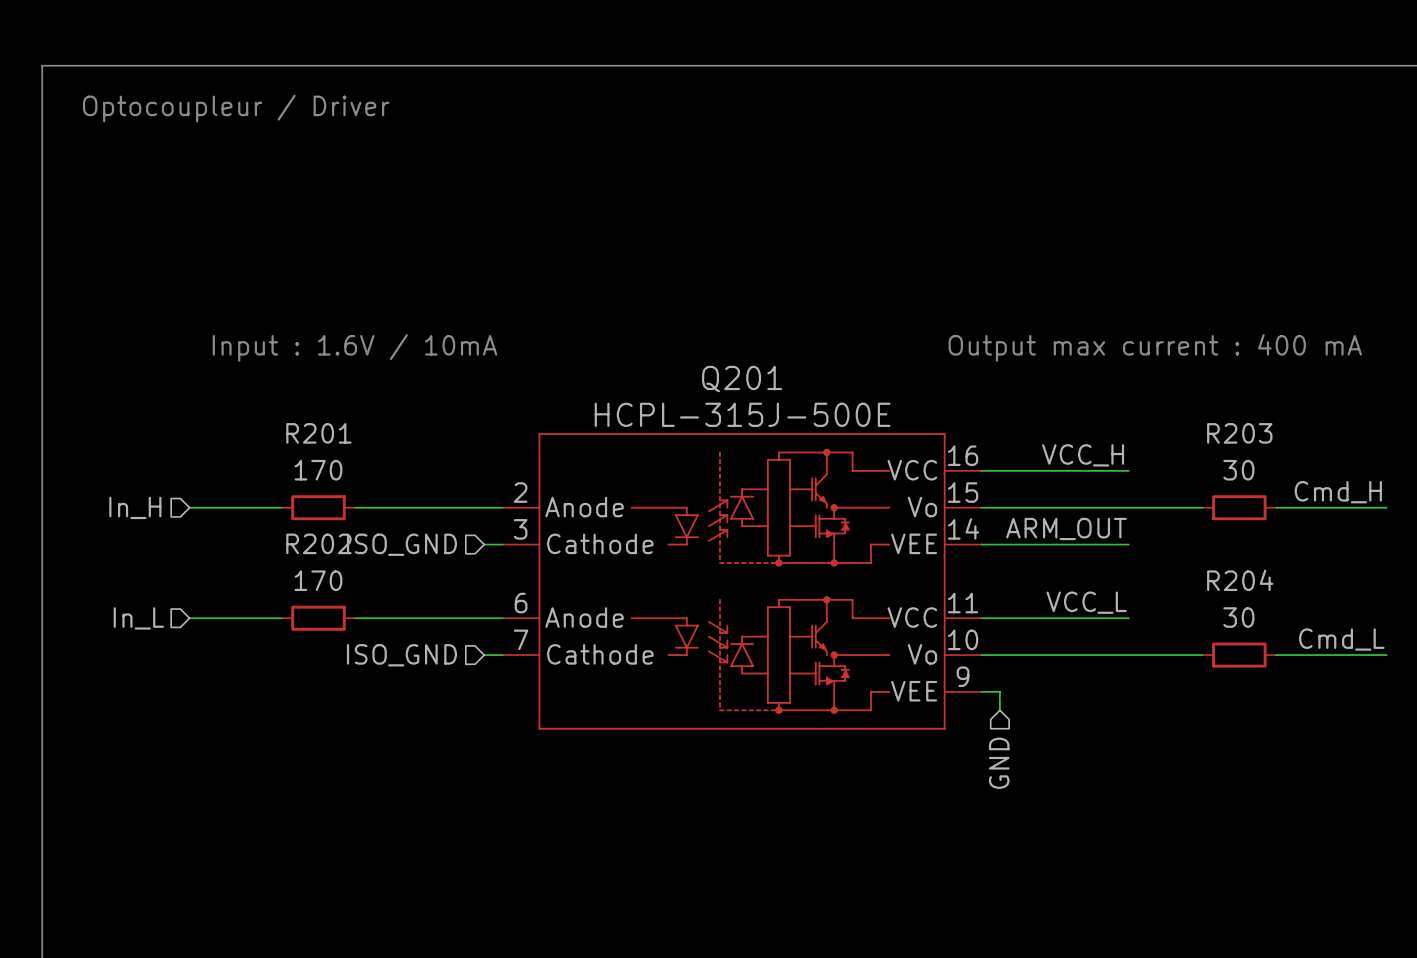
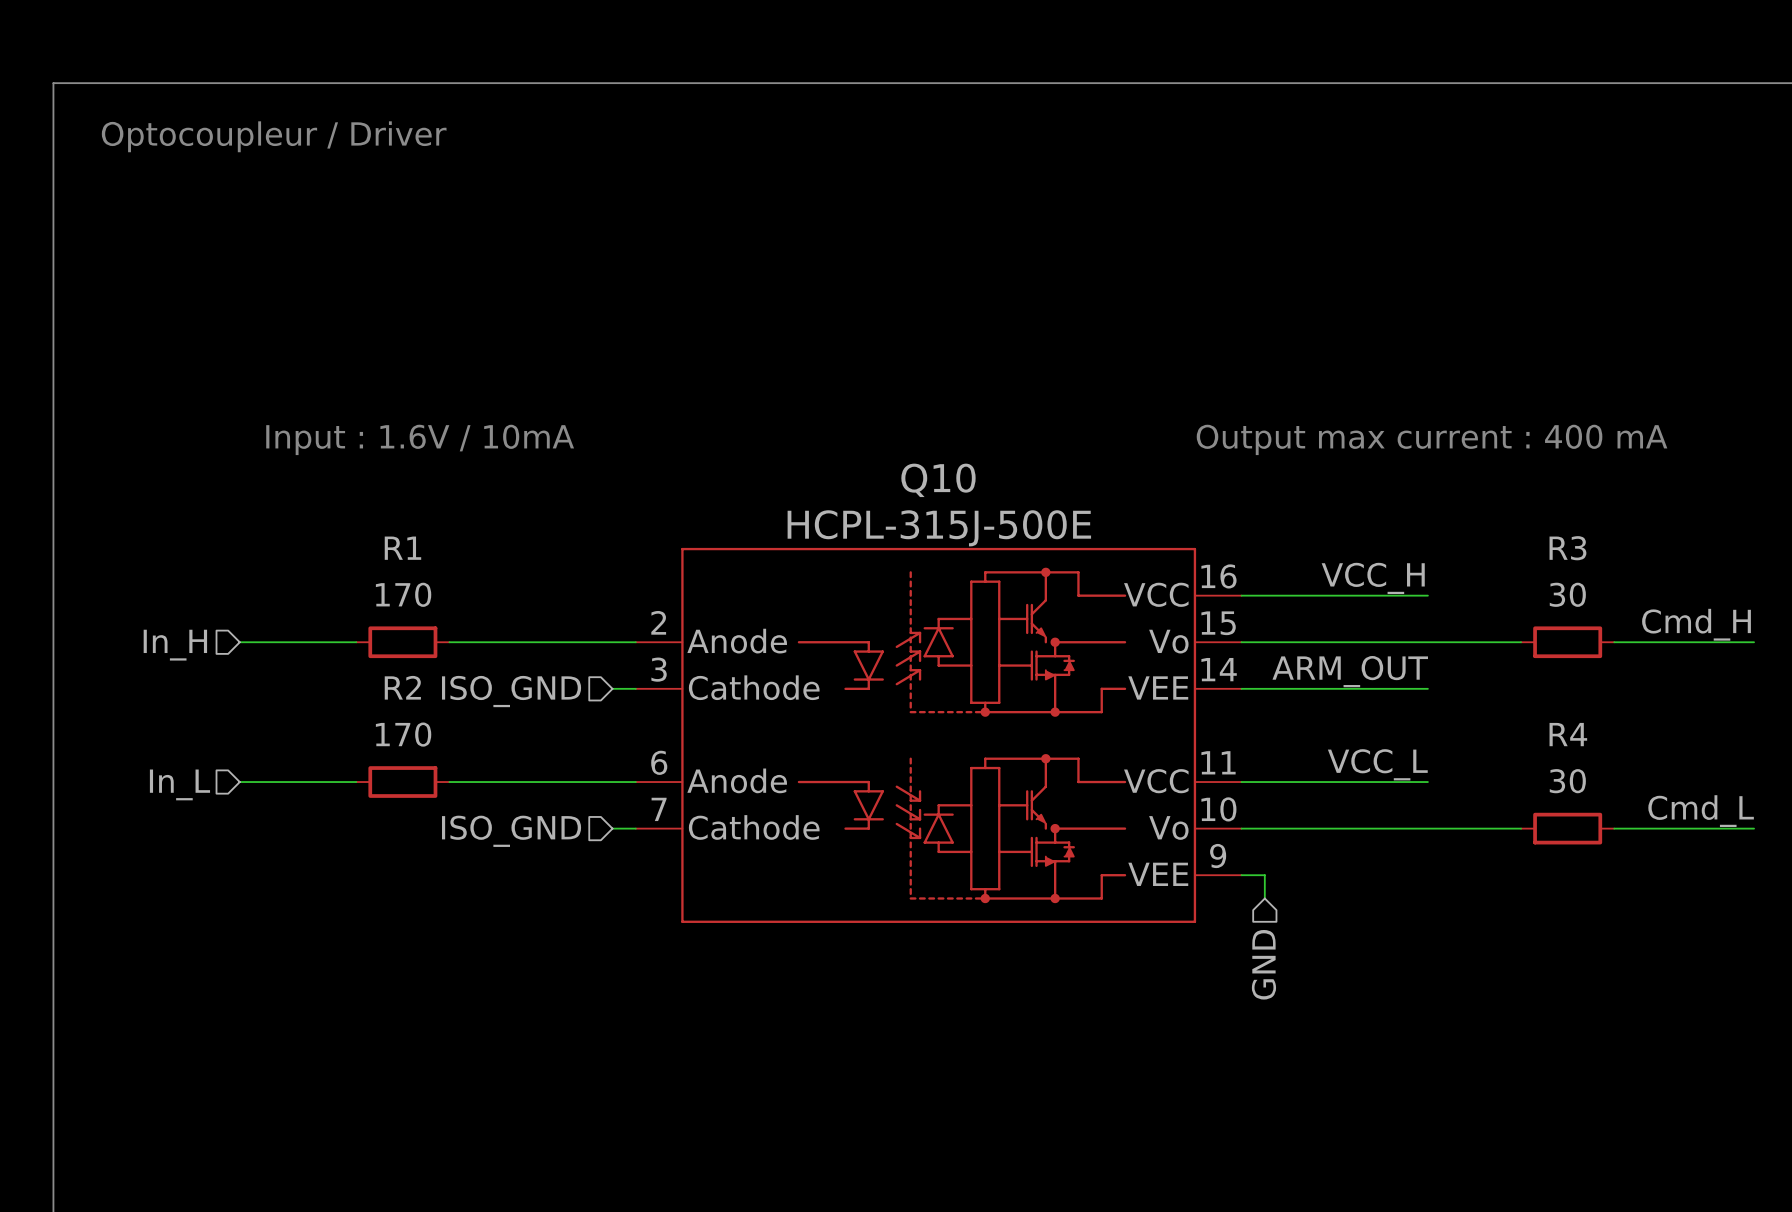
Q201 name: Q201 (742, 379) -> Q10 (938, 480)
R201 name: R201 (318, 433) -> R1 (402, 548)
R203 name: R203 (1239, 433) -> R3 (1567, 548)
R202 name: R202 (318, 543) -> R2 (402, 687)
R204 name: R204 (1240, 580) -> R4 (1568, 734)

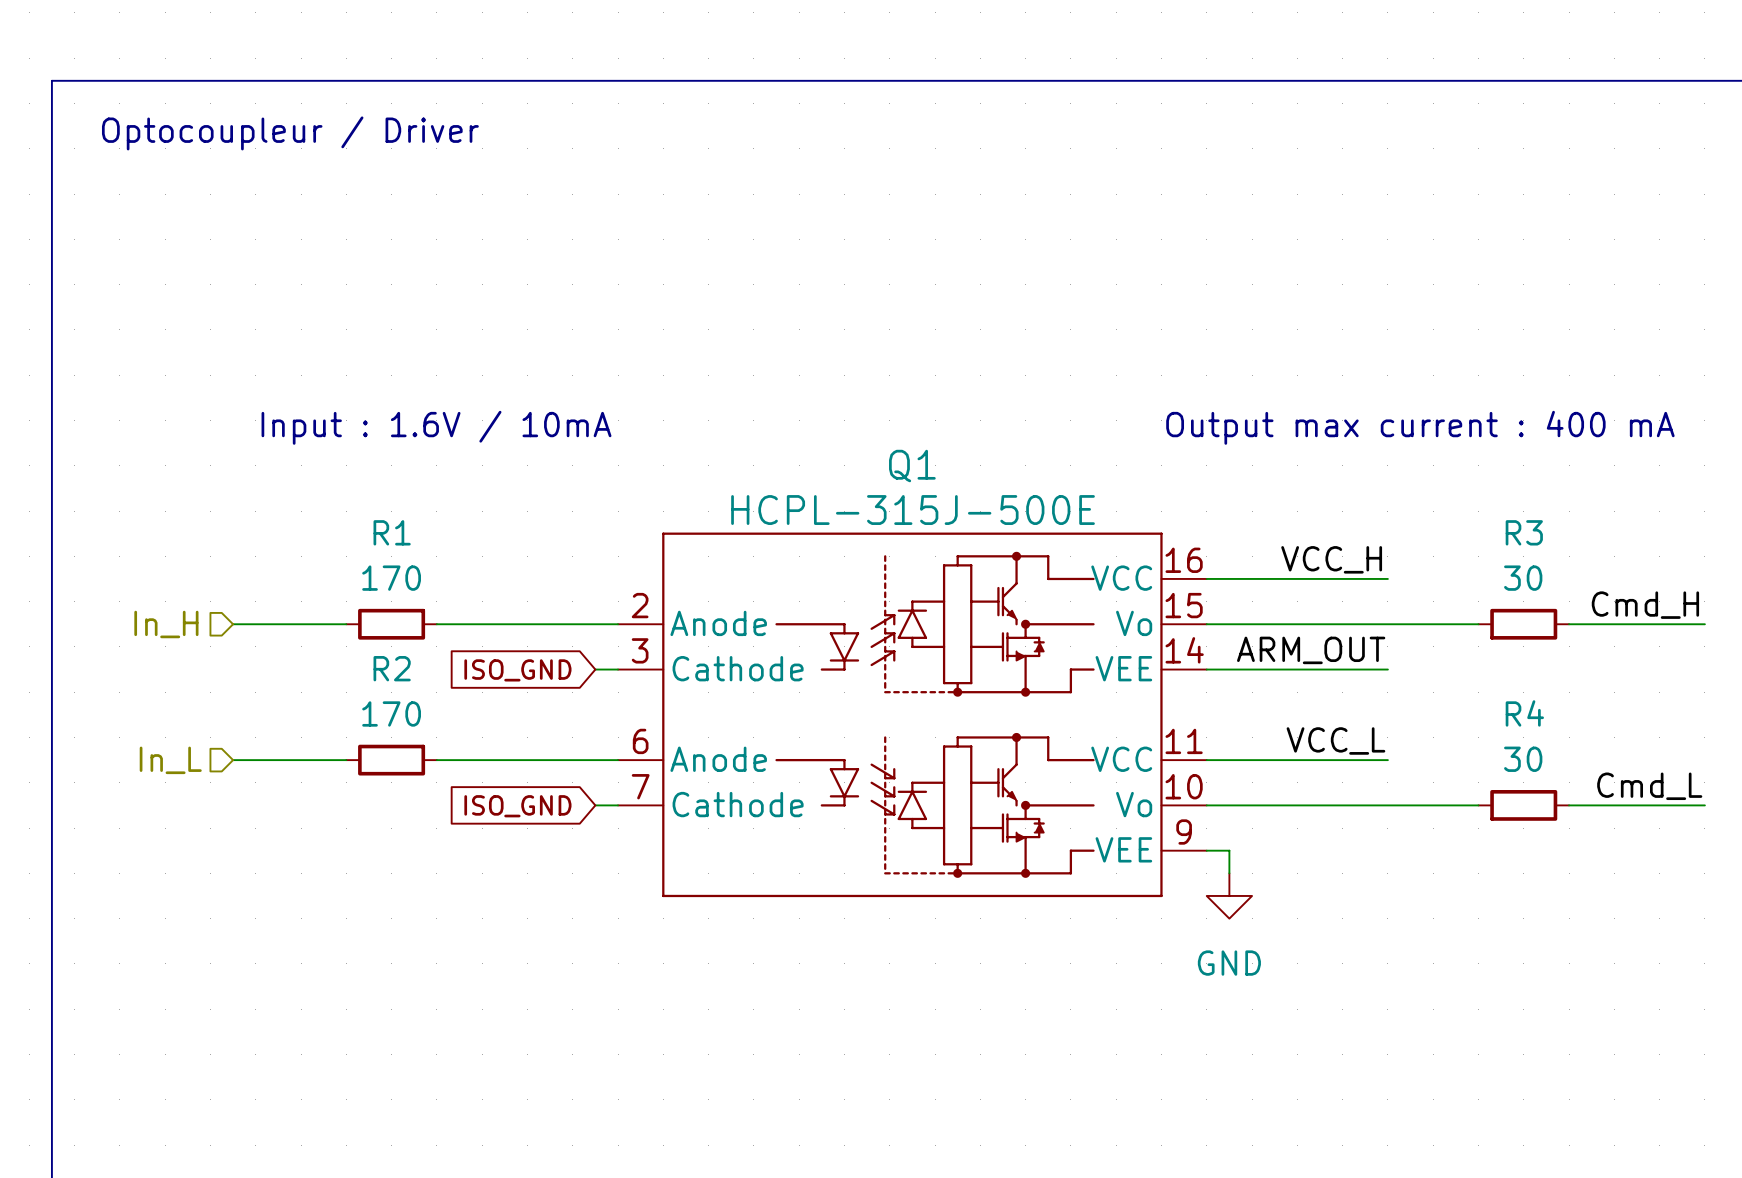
Q10 name: Q10 (938, 480) -> Q1 (912, 466)
hierarchical label: ISO_GND (511, 691) -> none
global label: none -> ISO_GND (517, 670)
hierarchical label: ISO_GND (511, 831) -> none
global label: none -> ISO_GND (517, 806)
power symbol: none -> GND (1229, 895)
hierarchical label: GND (1263, 964) -> none

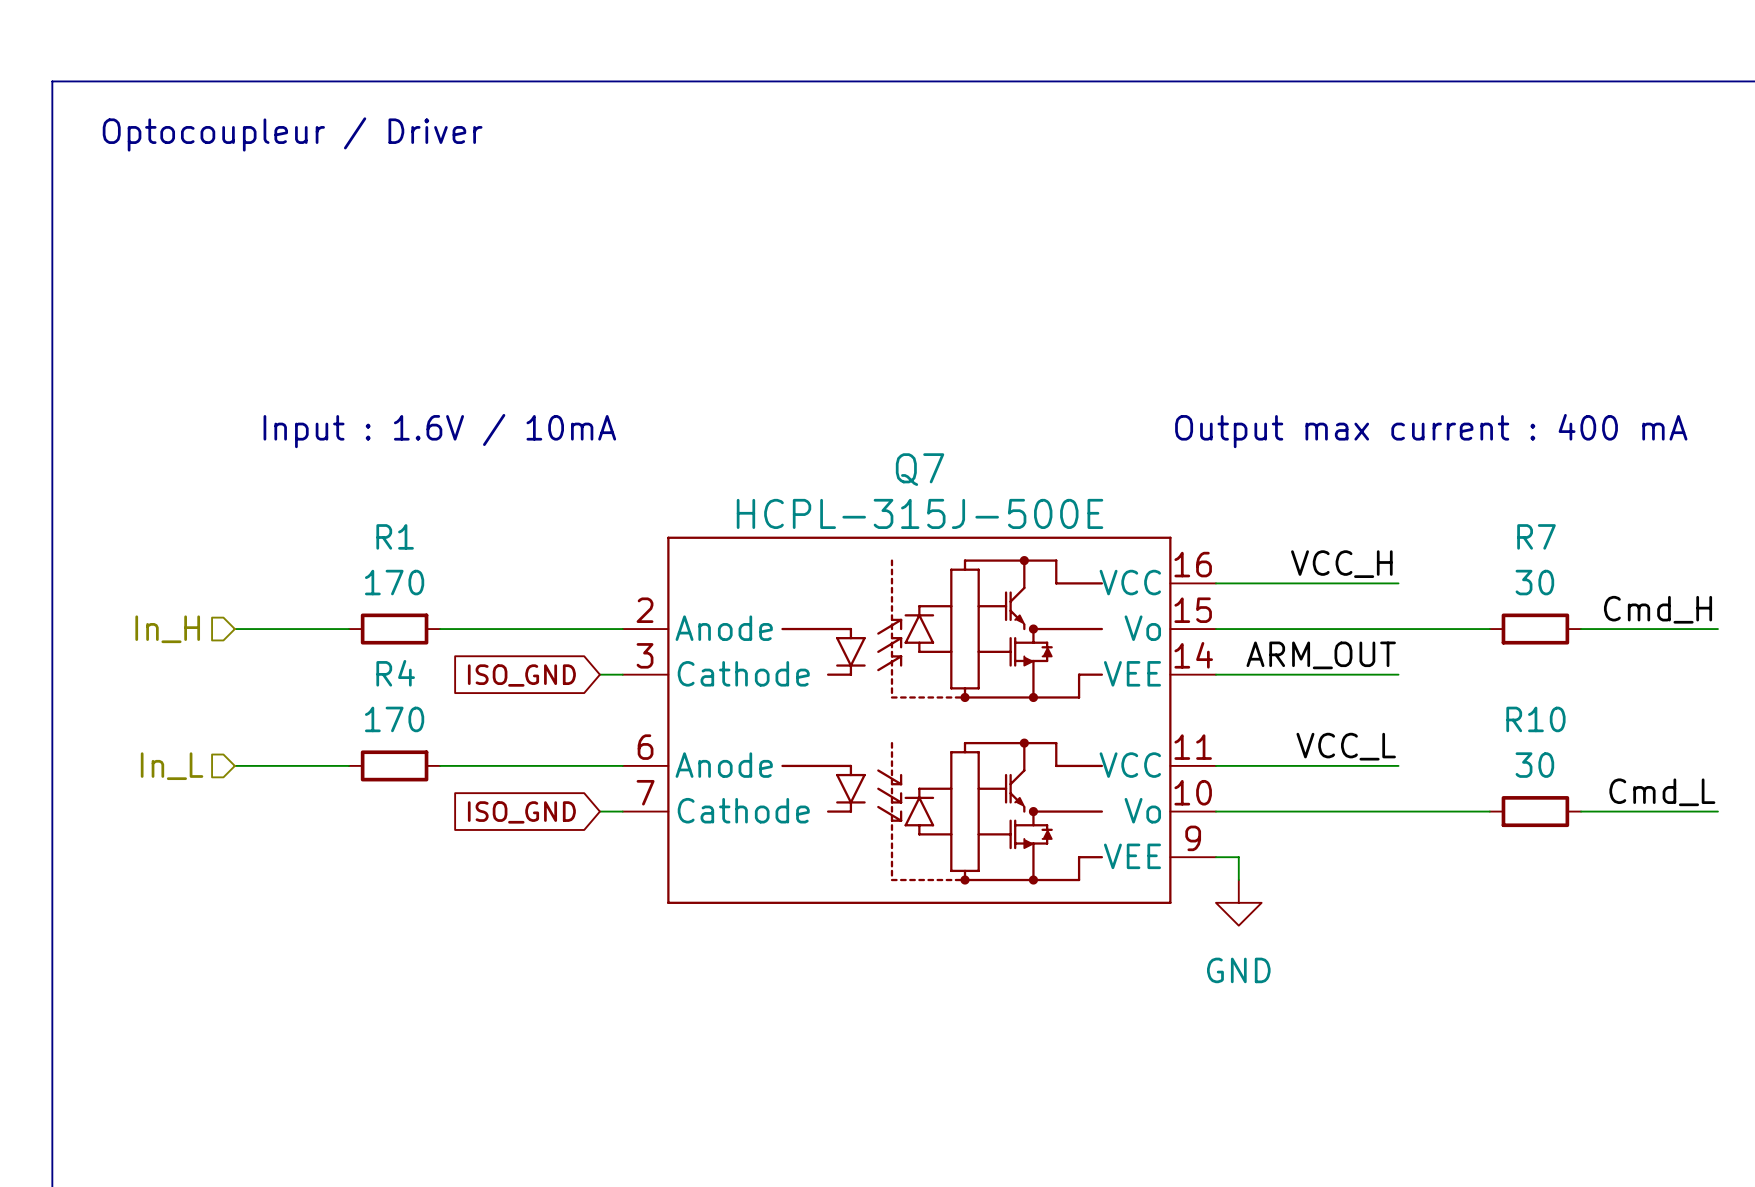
Q1 name: Q1 (912, 466) -> Q7 (920, 469)
R3 name: R3 (1524, 532) -> R7 (1536, 536)
R2 name: R2 (392, 668) -> R4 (395, 673)
R4 name: R4 (1524, 713) -> R10 (1535, 719)

